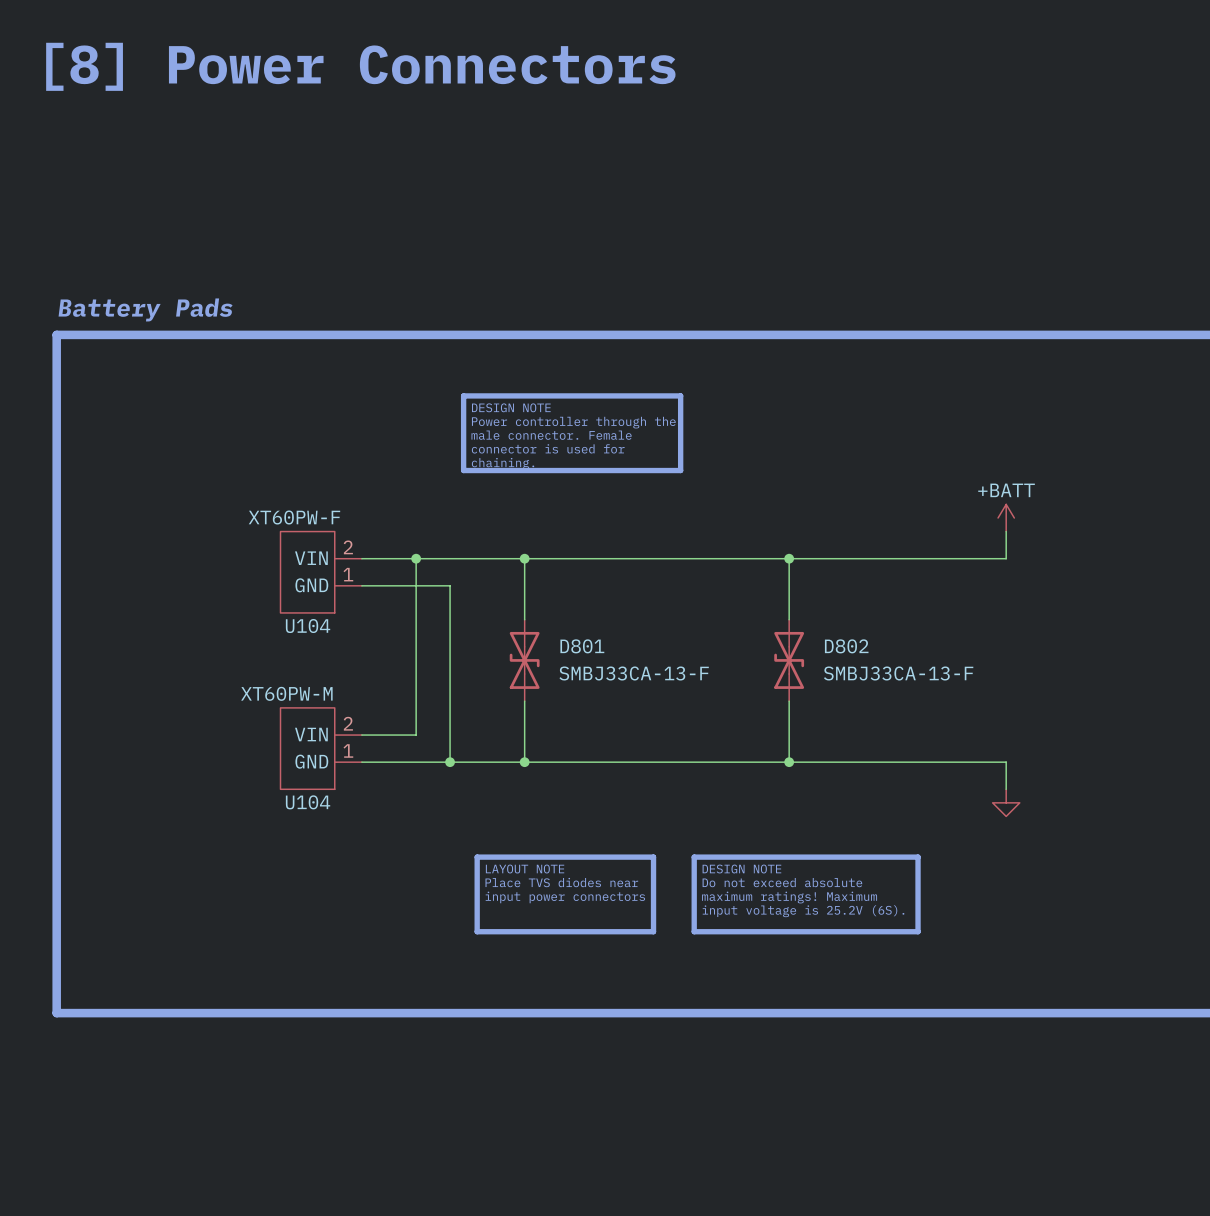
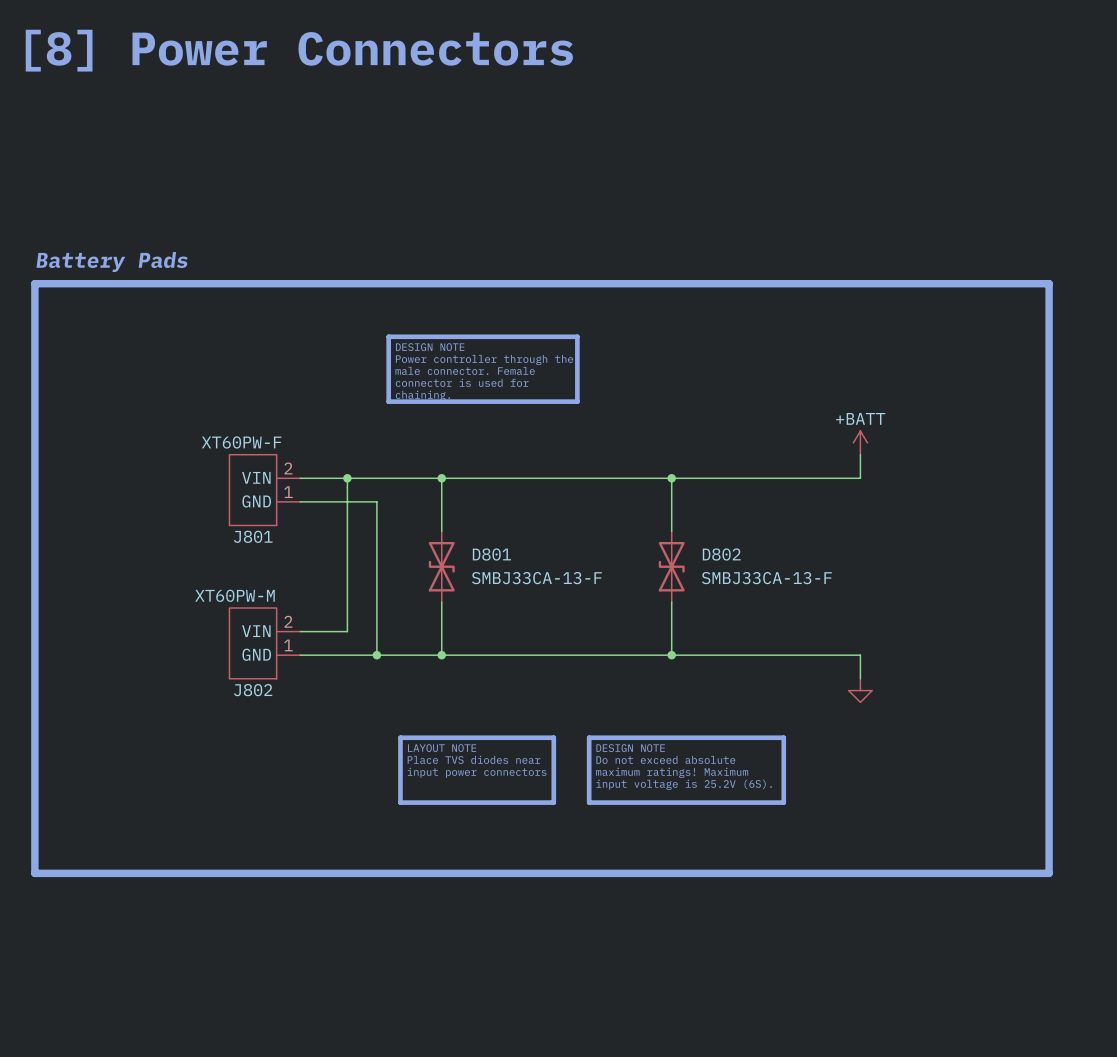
U104 name: U104 (308, 626) -> J801 (253, 536)
U104 name: U104 (308, 802) -> J802 (253, 690)

